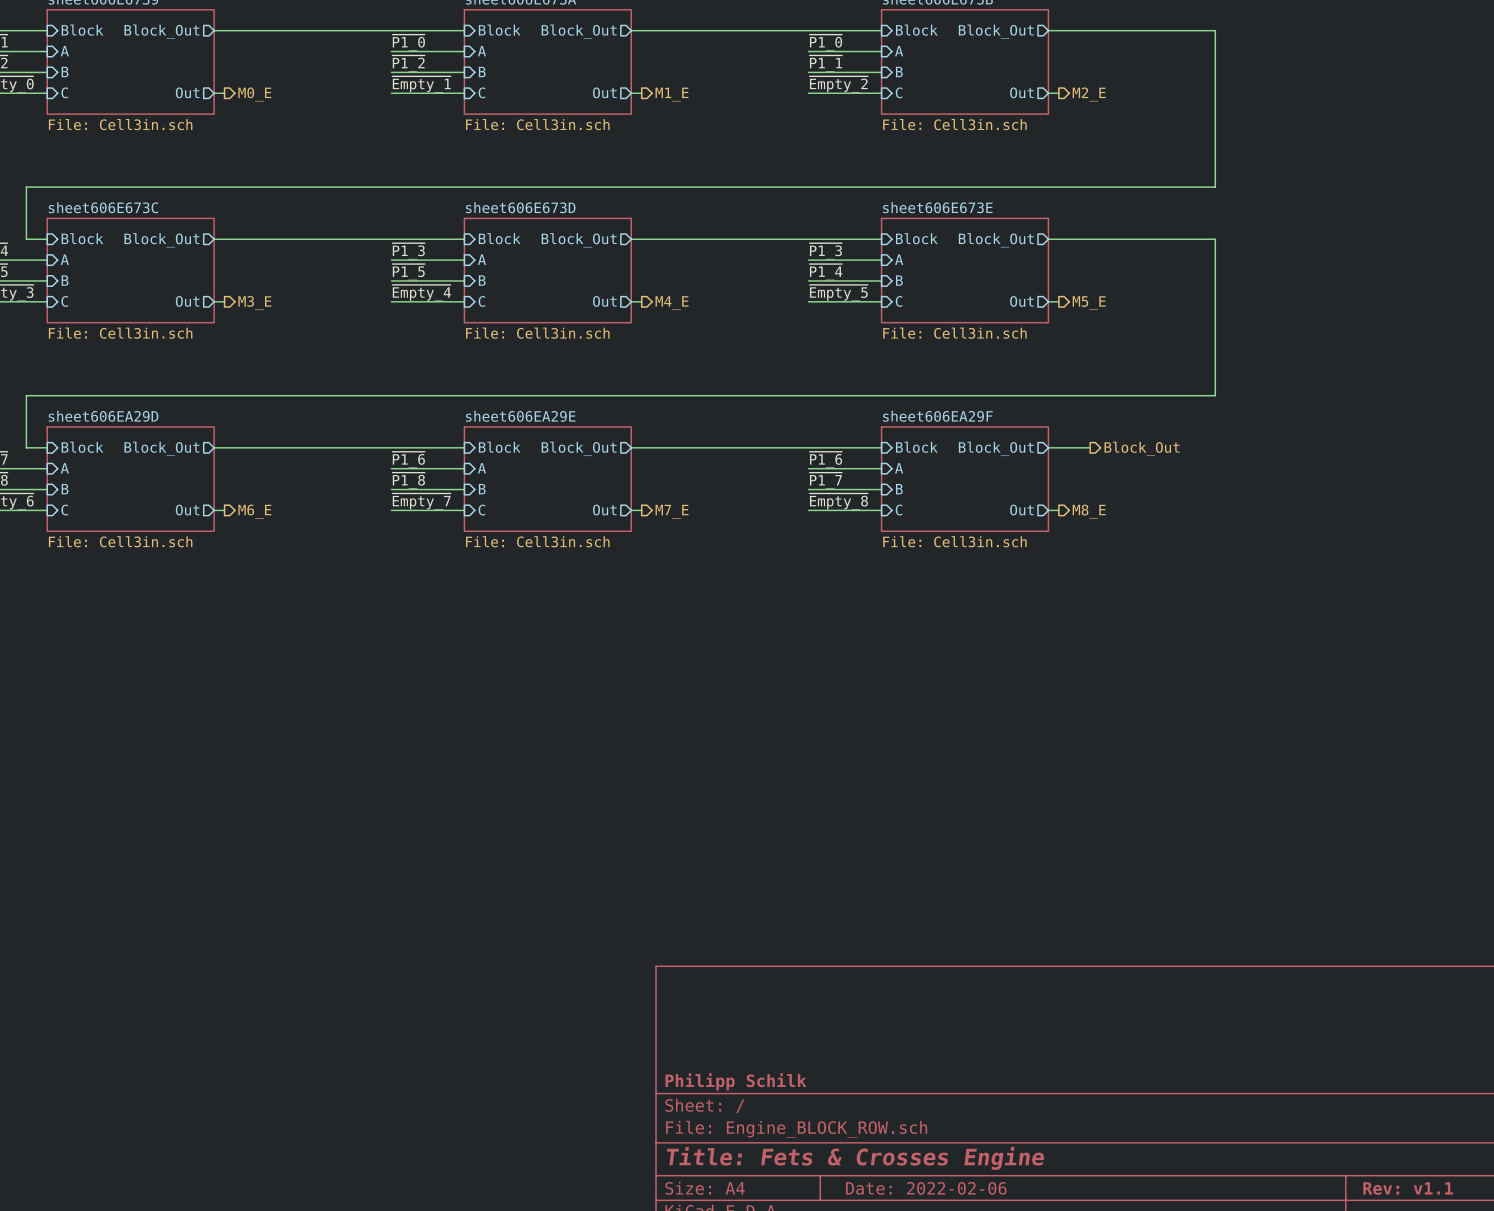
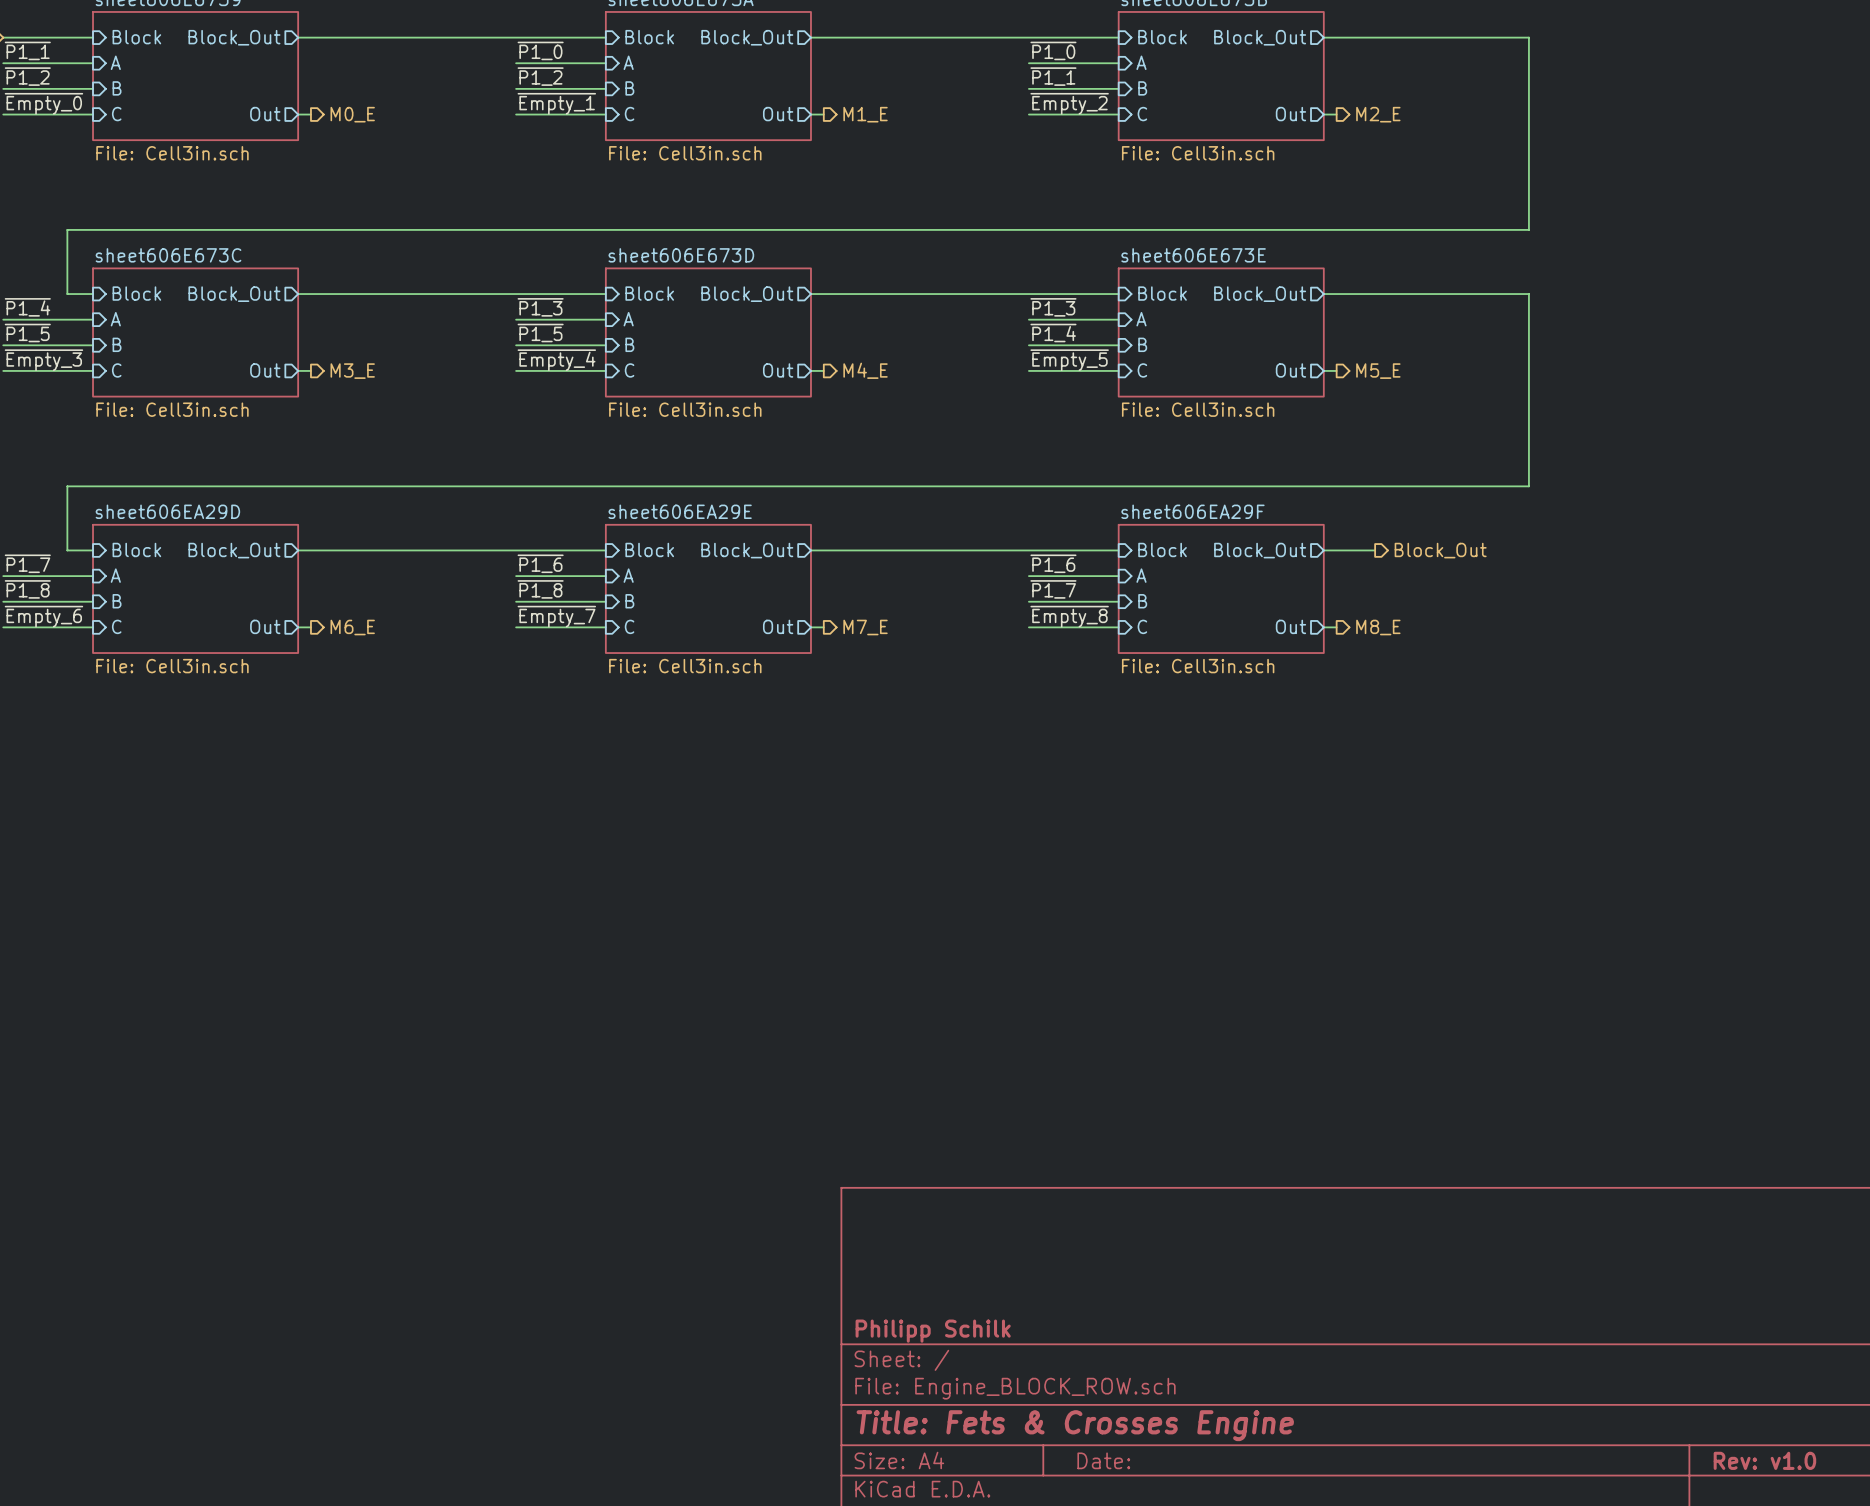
title block: Date: 2022-02-06 (926, 1188) -> Date: (1103, 1460)
title block: Rev: v1.1 (1408, 1188) -> Rev: v1.0 (1764, 1460)

